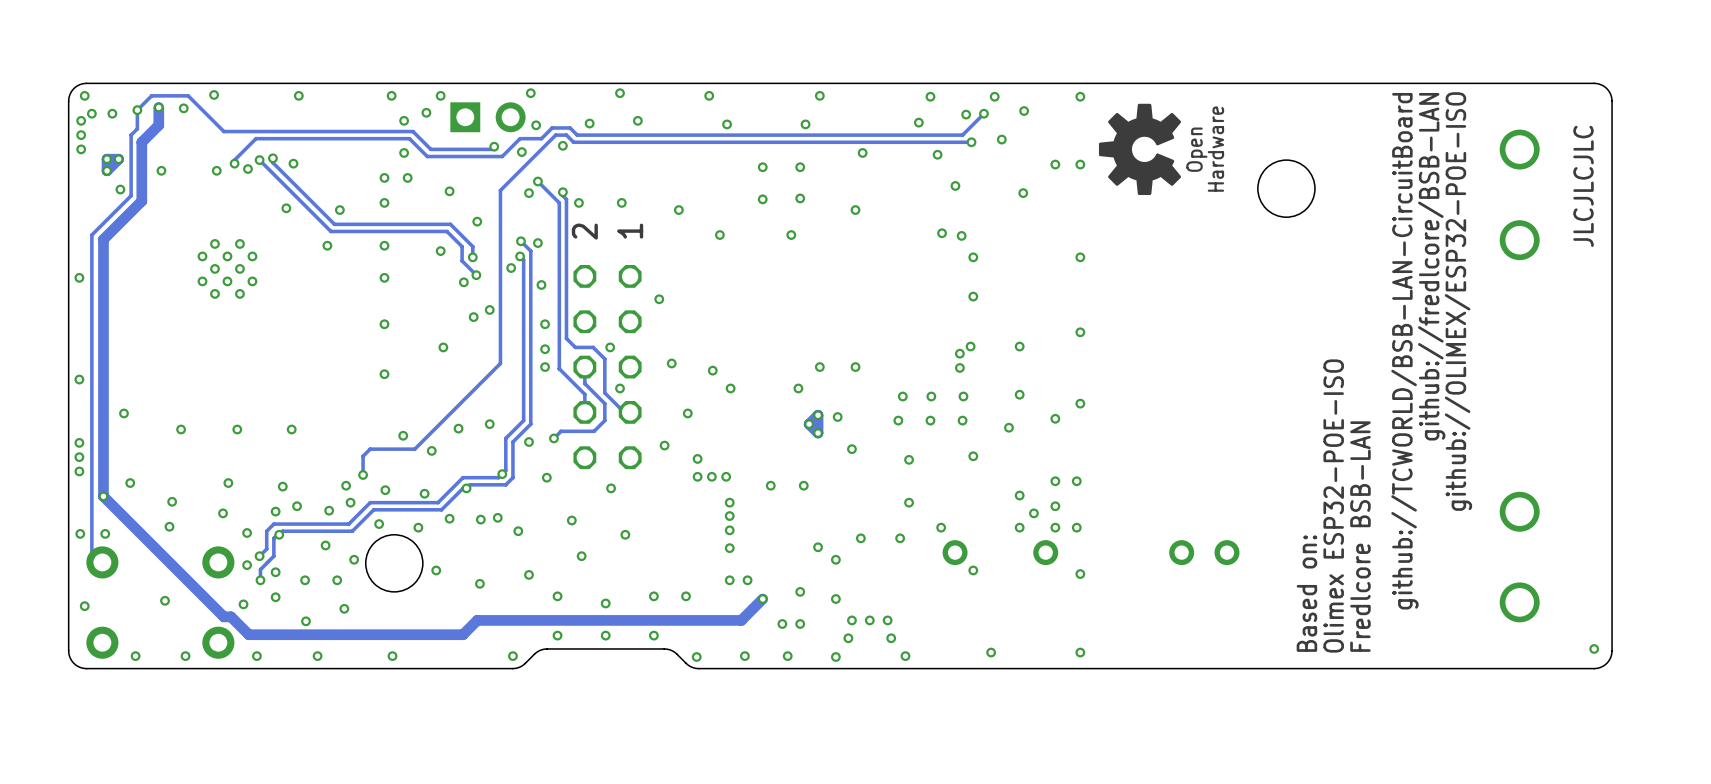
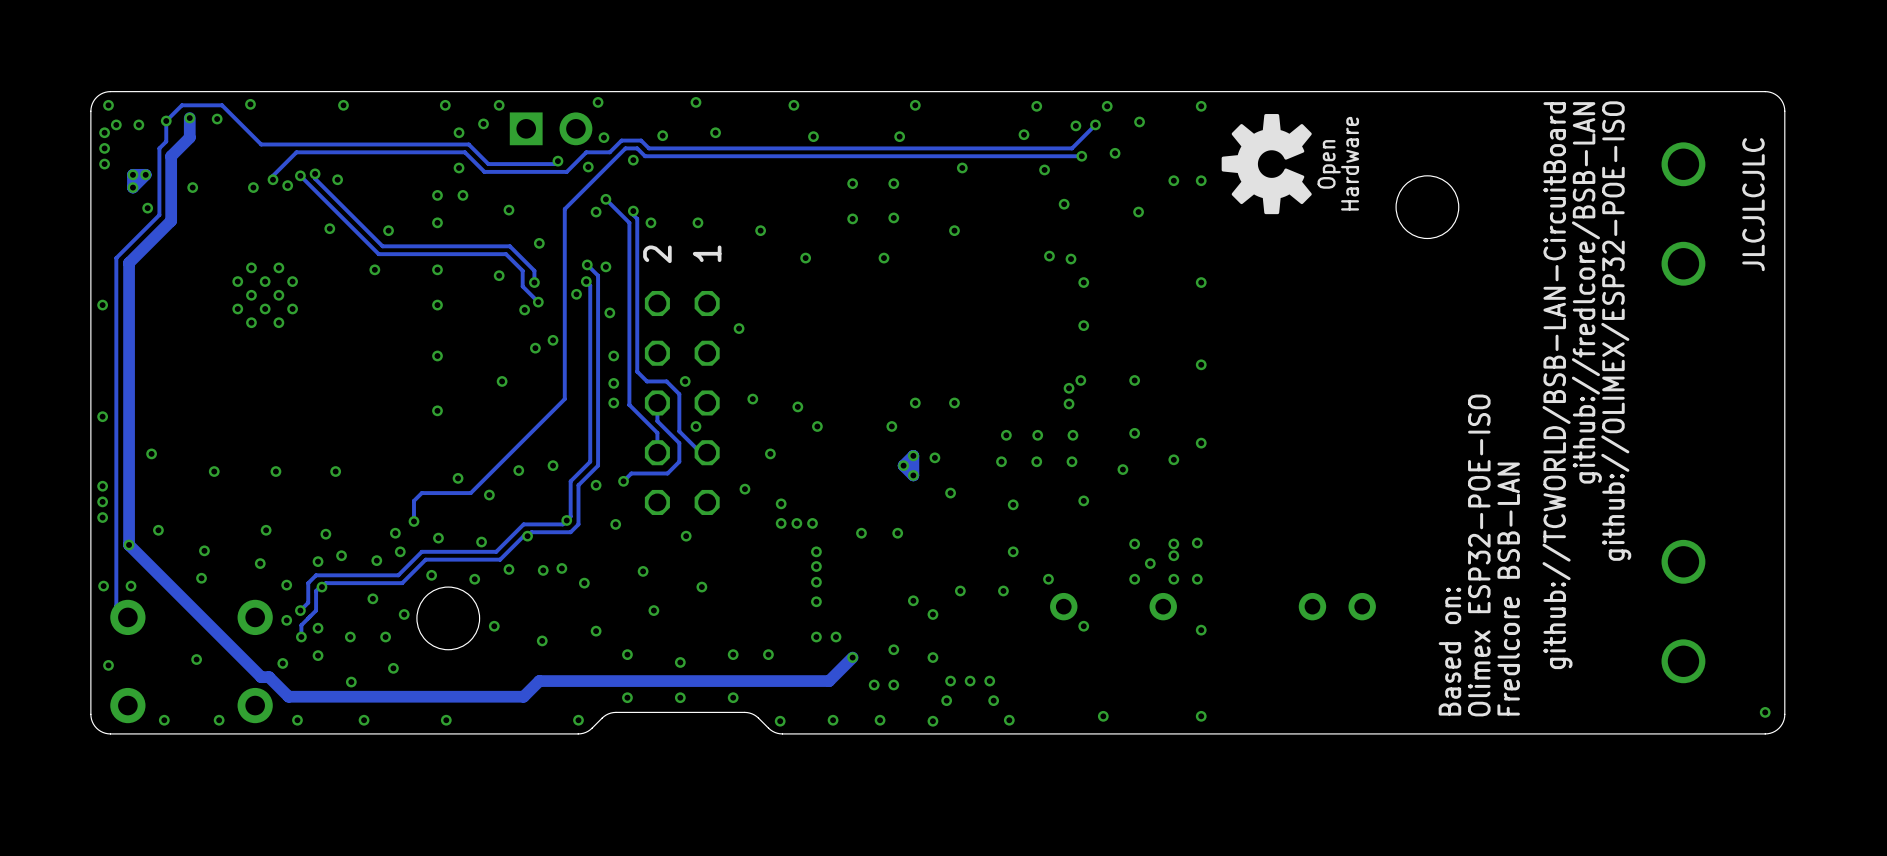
via: (1055, 481) -> none
via: (1076, 481) -> none
via: none -> (1197, 543)
via: none -> (1173, 543)

